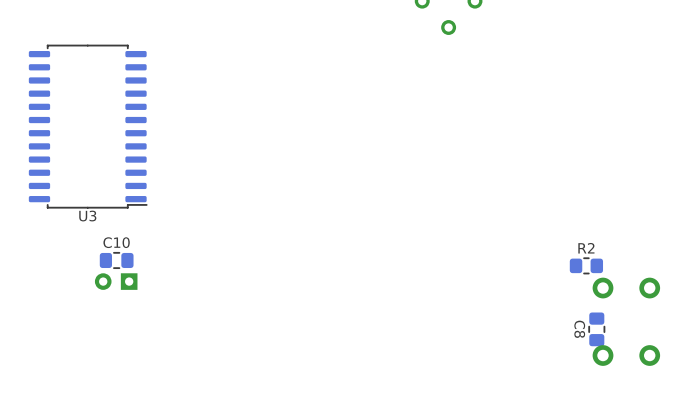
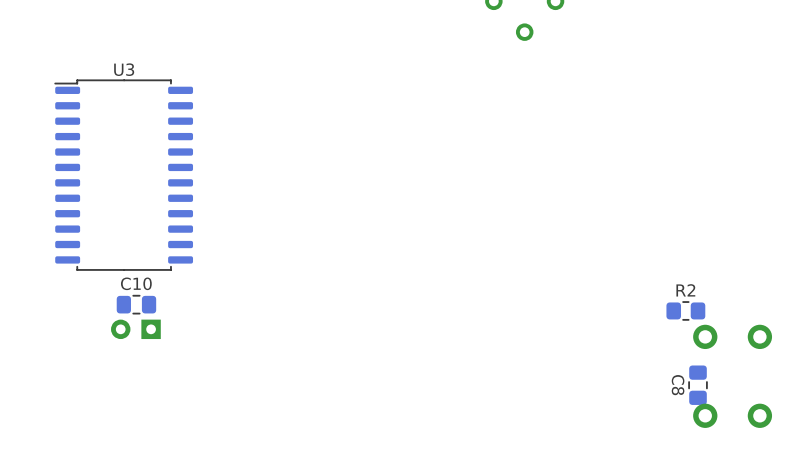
U3 rotation: 0° (88, 126) -> 180° (123, 175)

